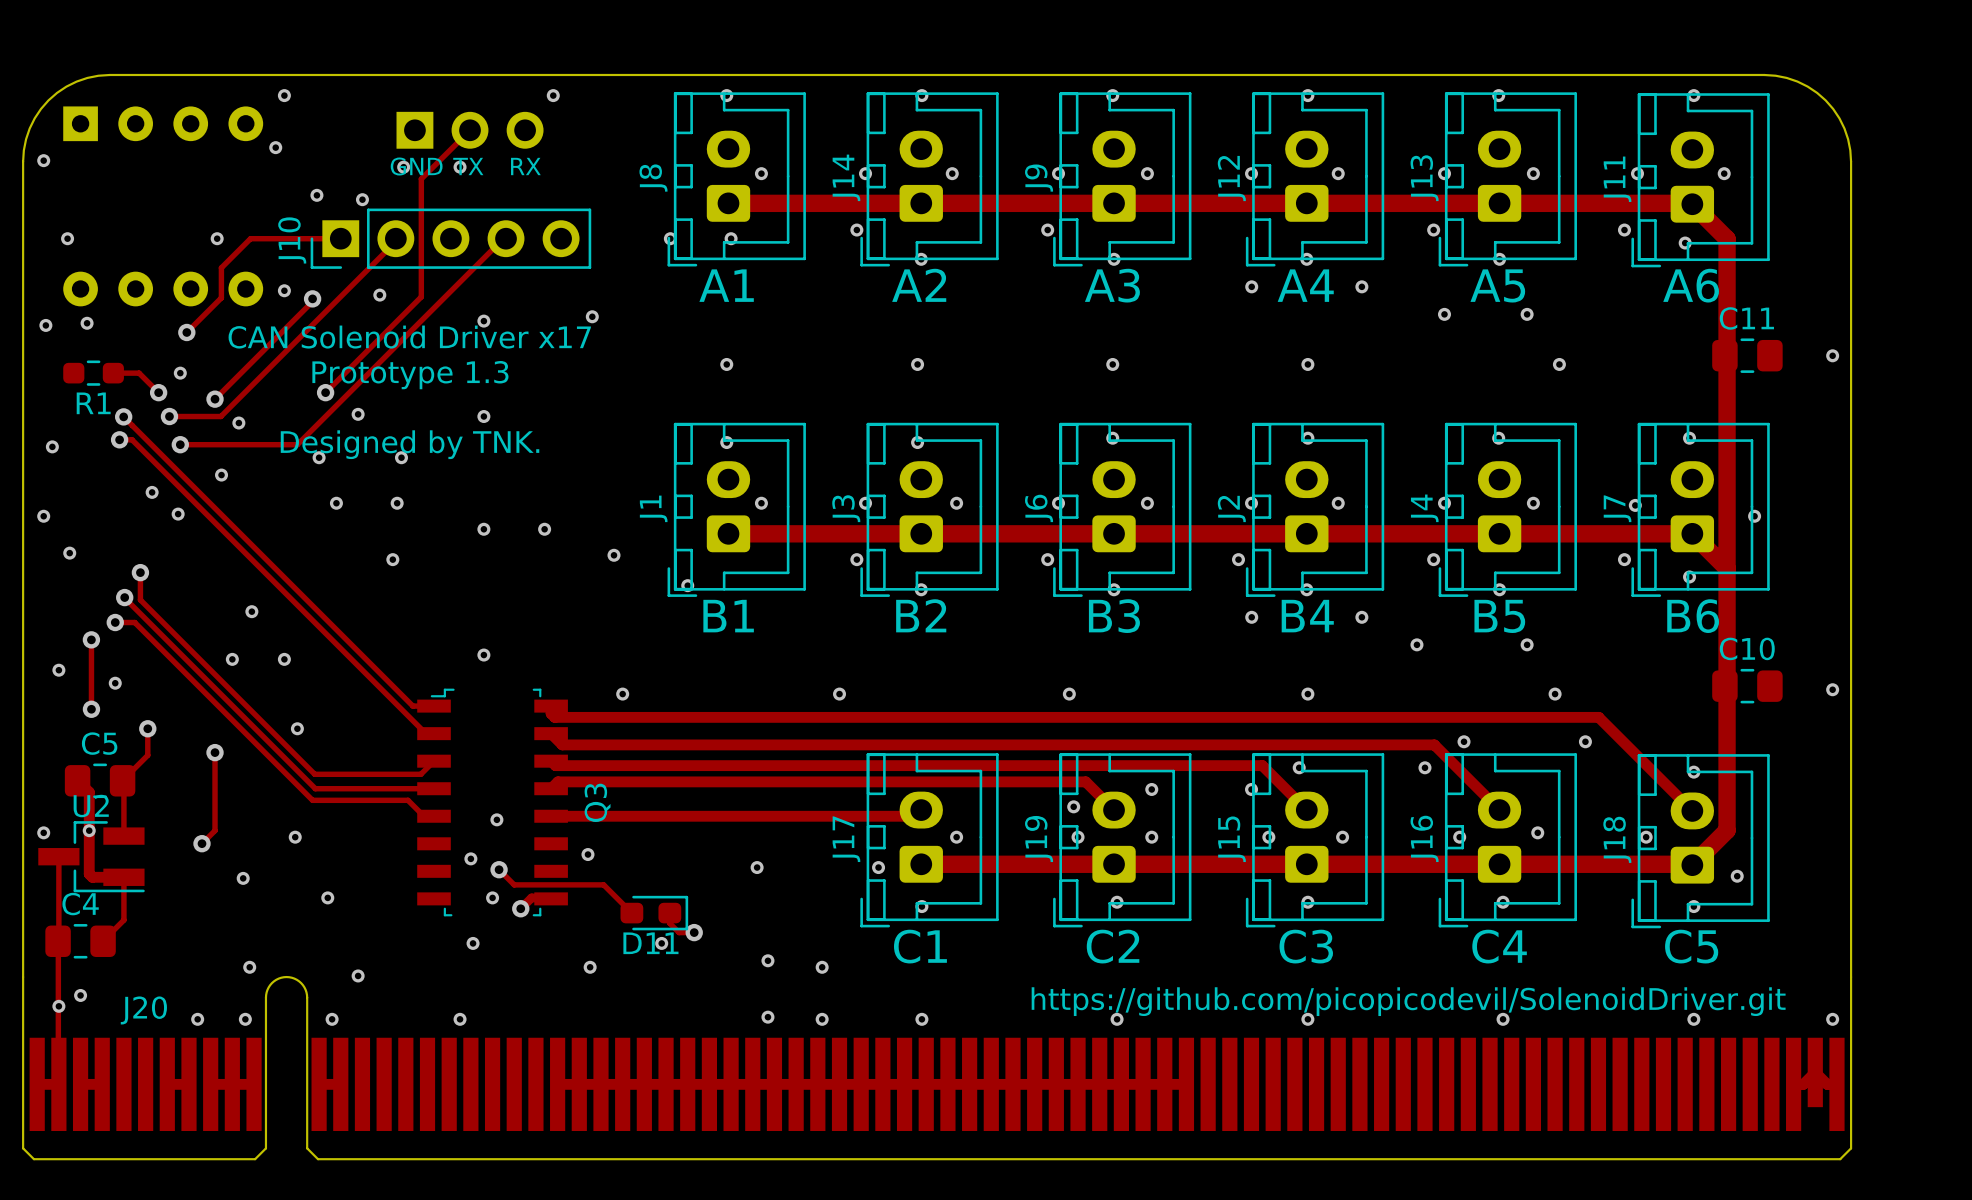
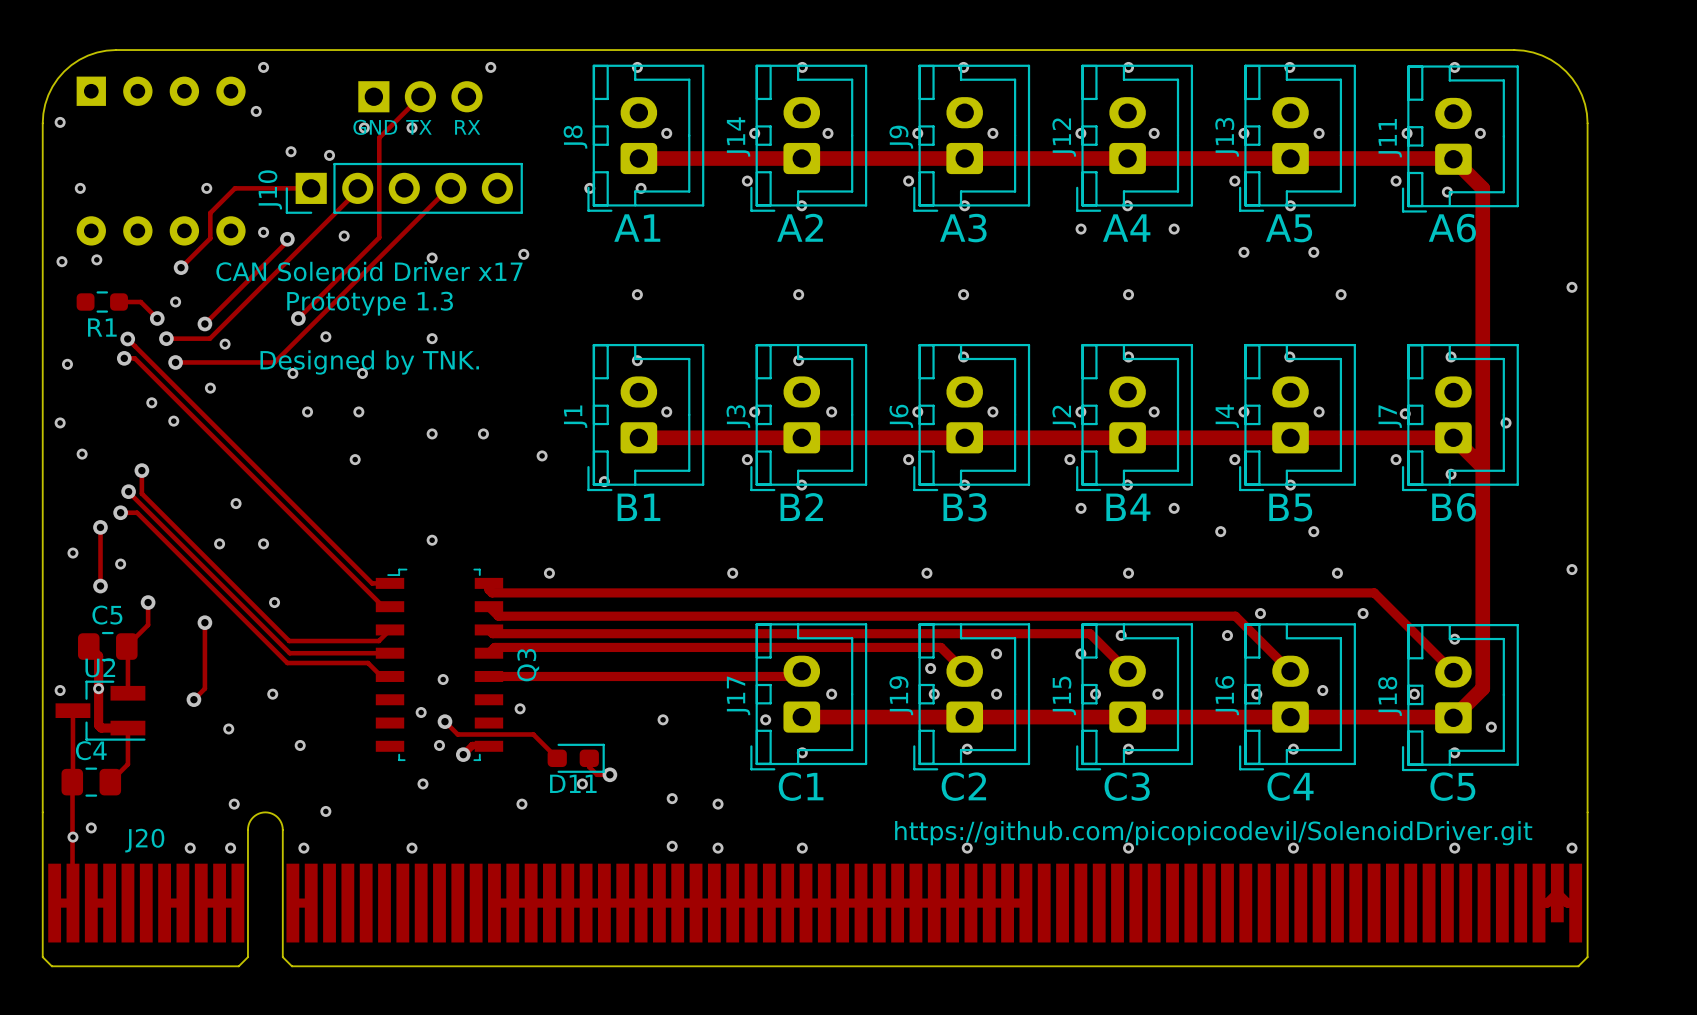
C11: (1747, 355) -> none
C10: (1747, 686) -> none

